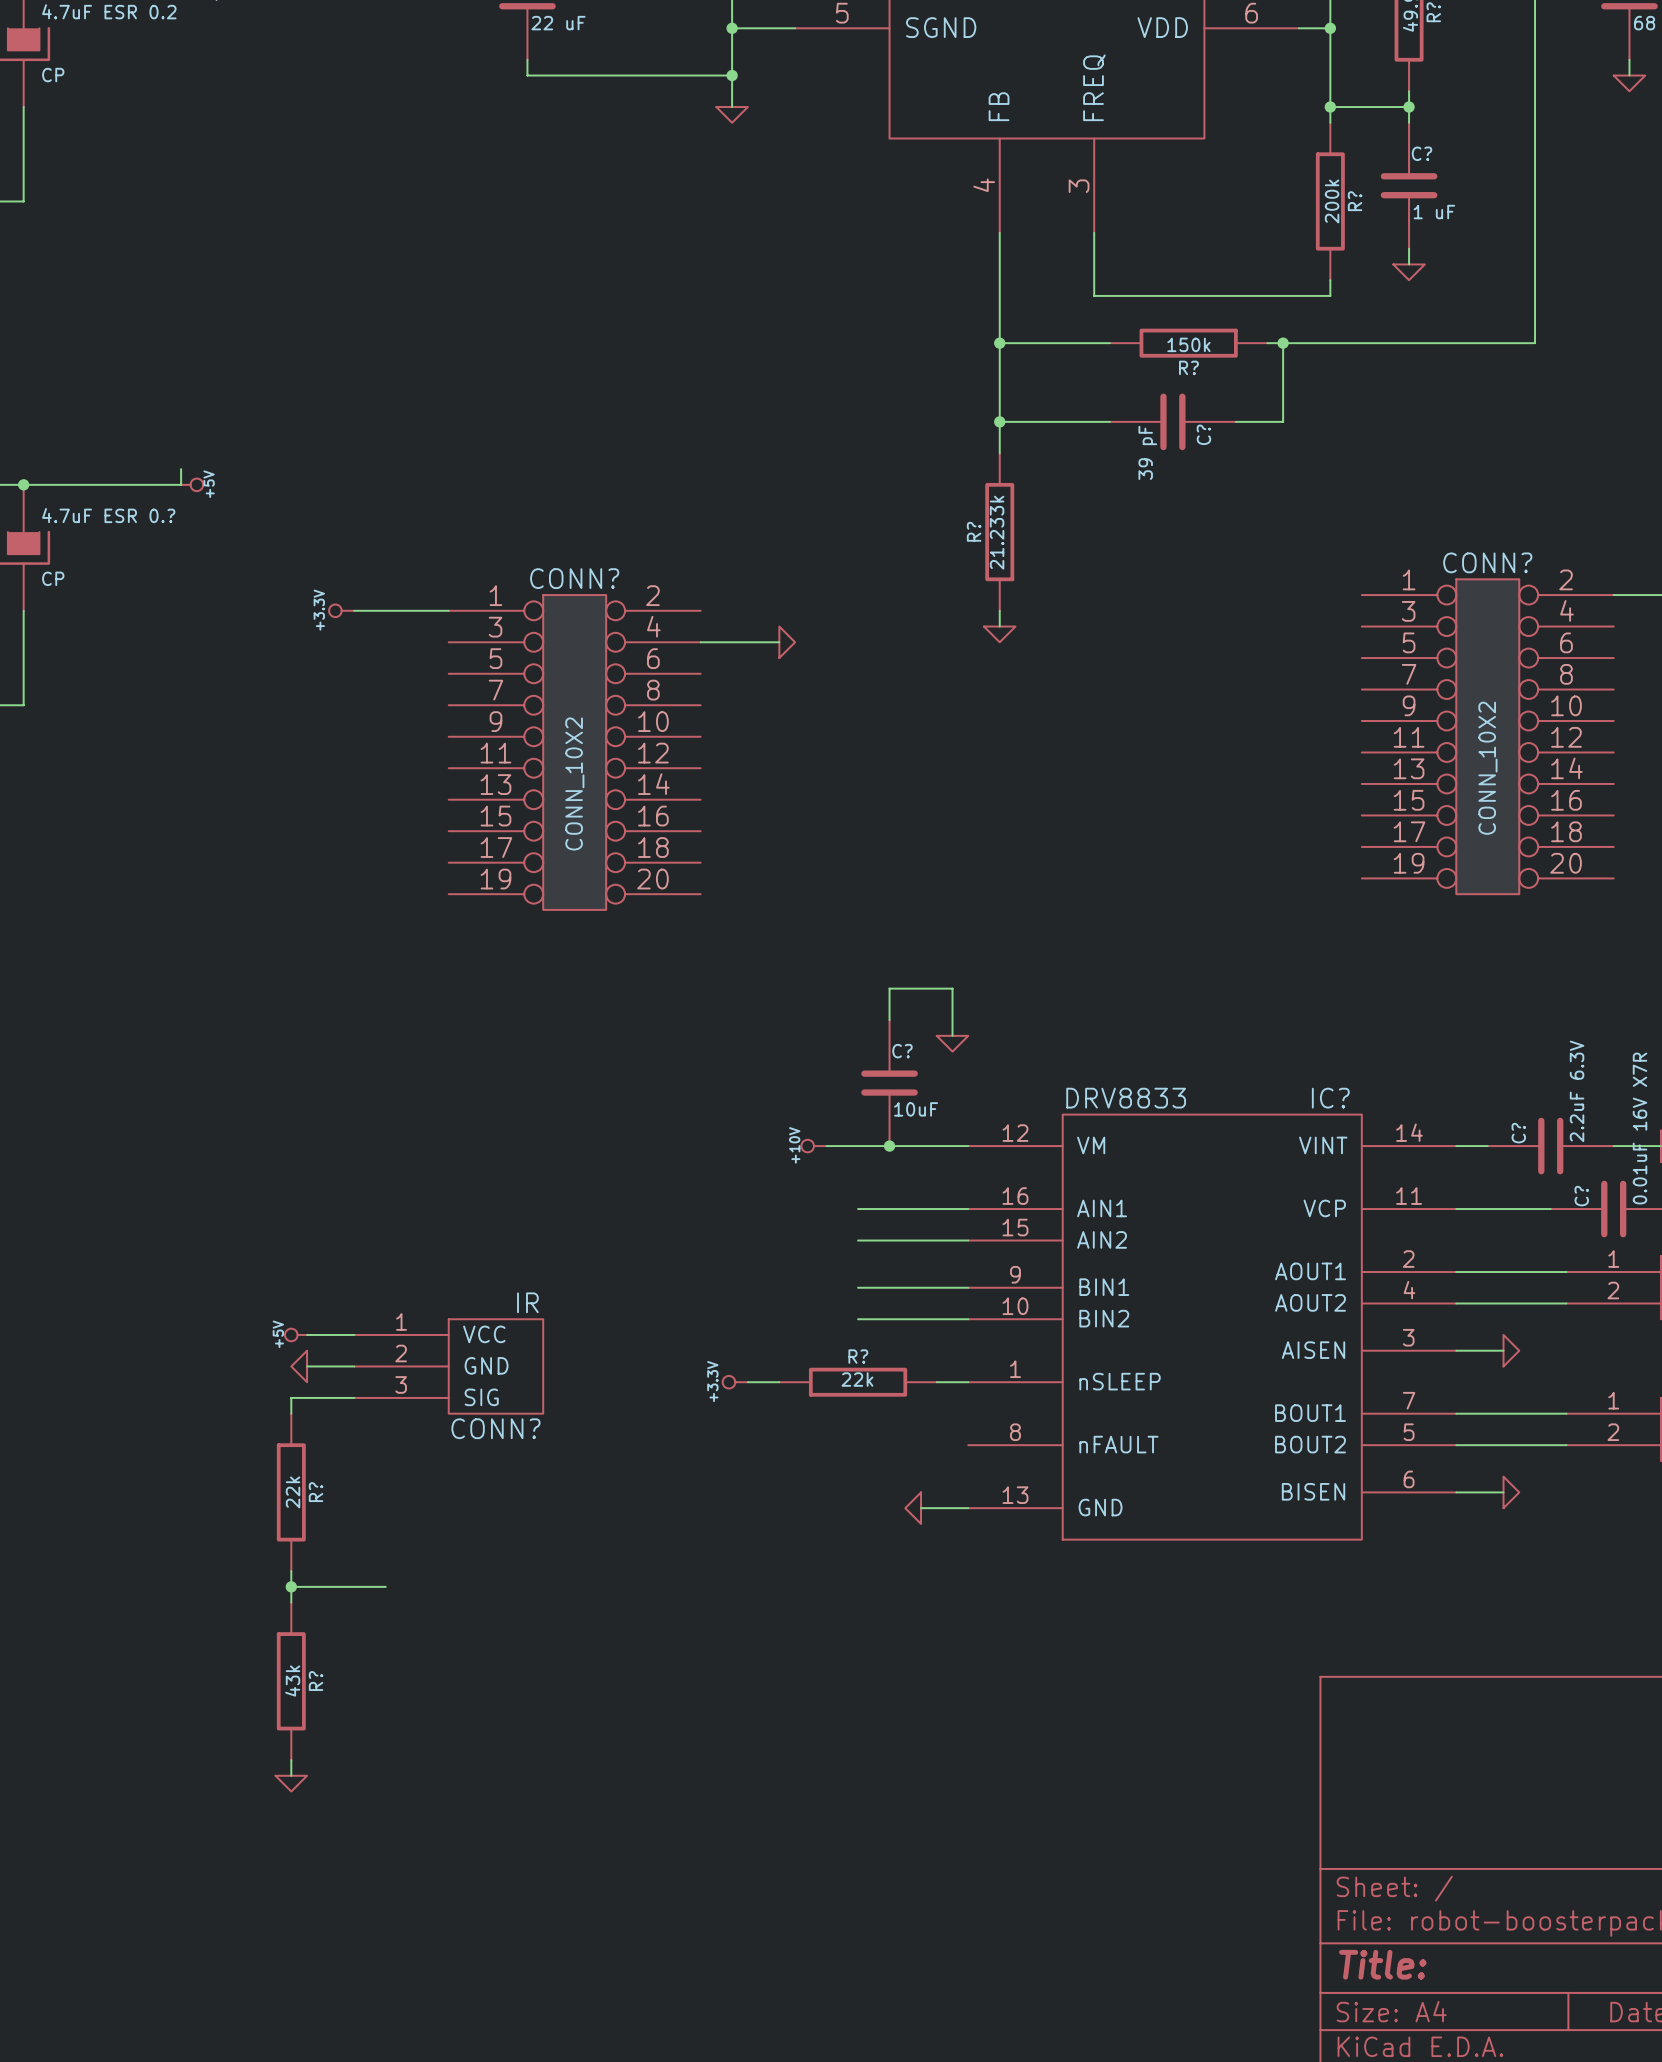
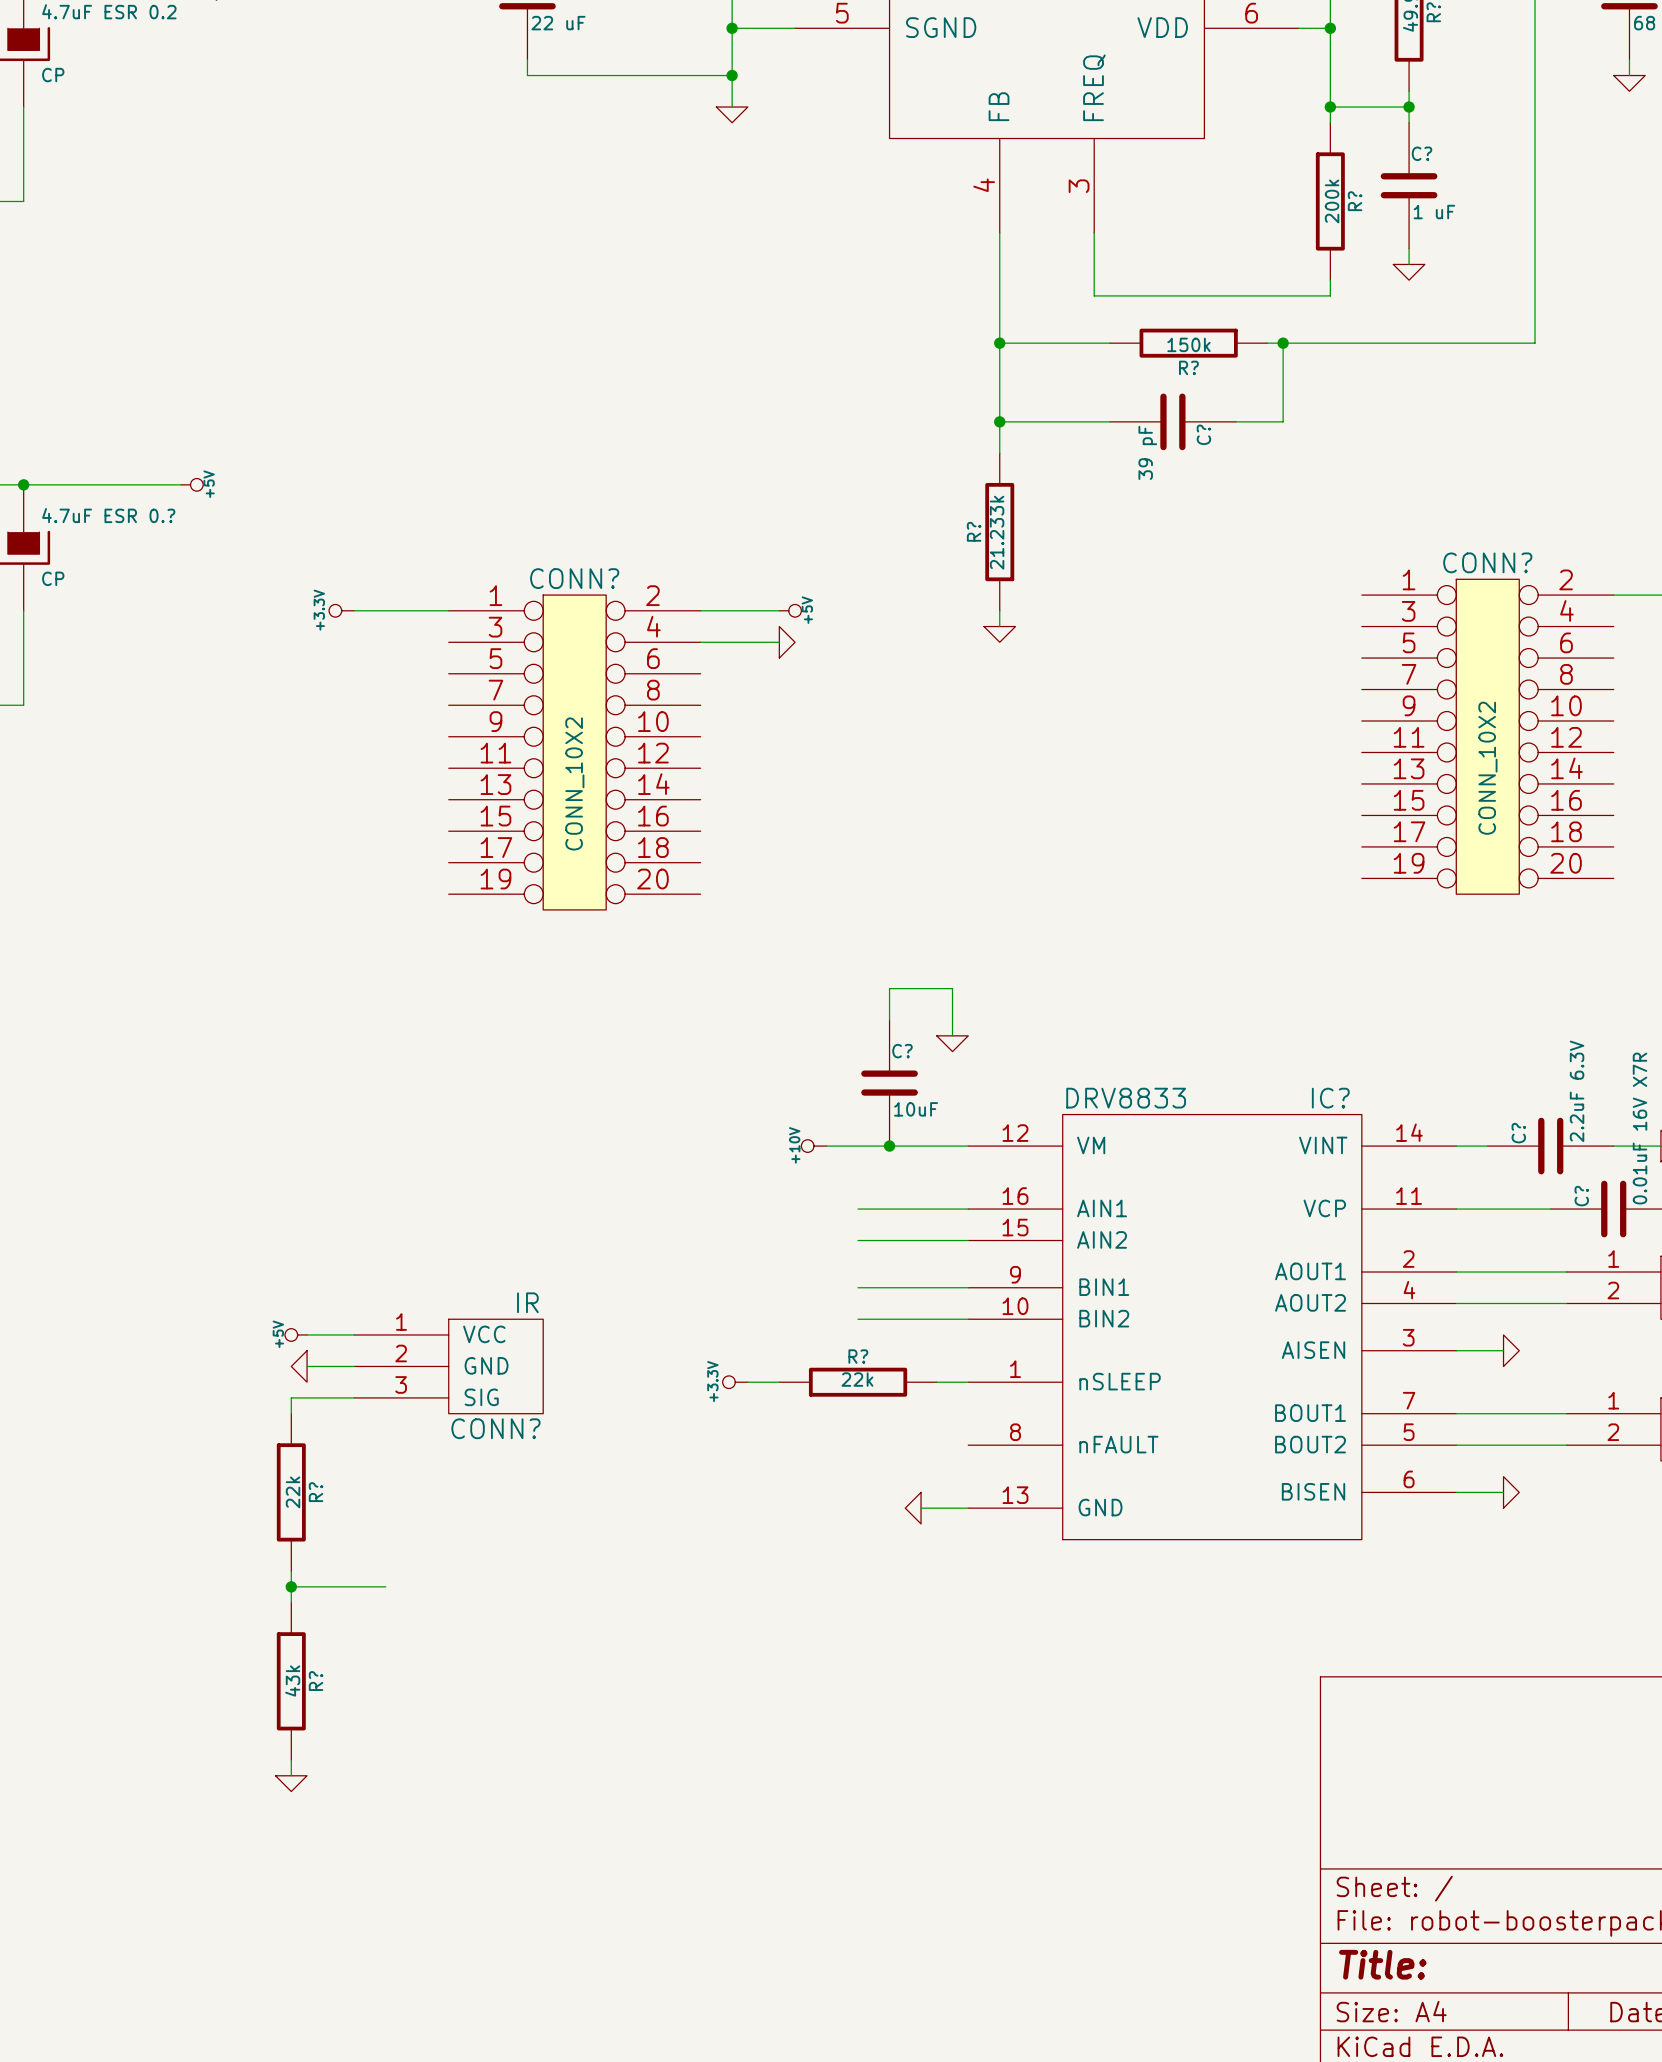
wire: (181, 469) (181, 484) -> none
wire: none -> (700, 610) (779, 610)
power symbol: none -> +5V (790, 610)

